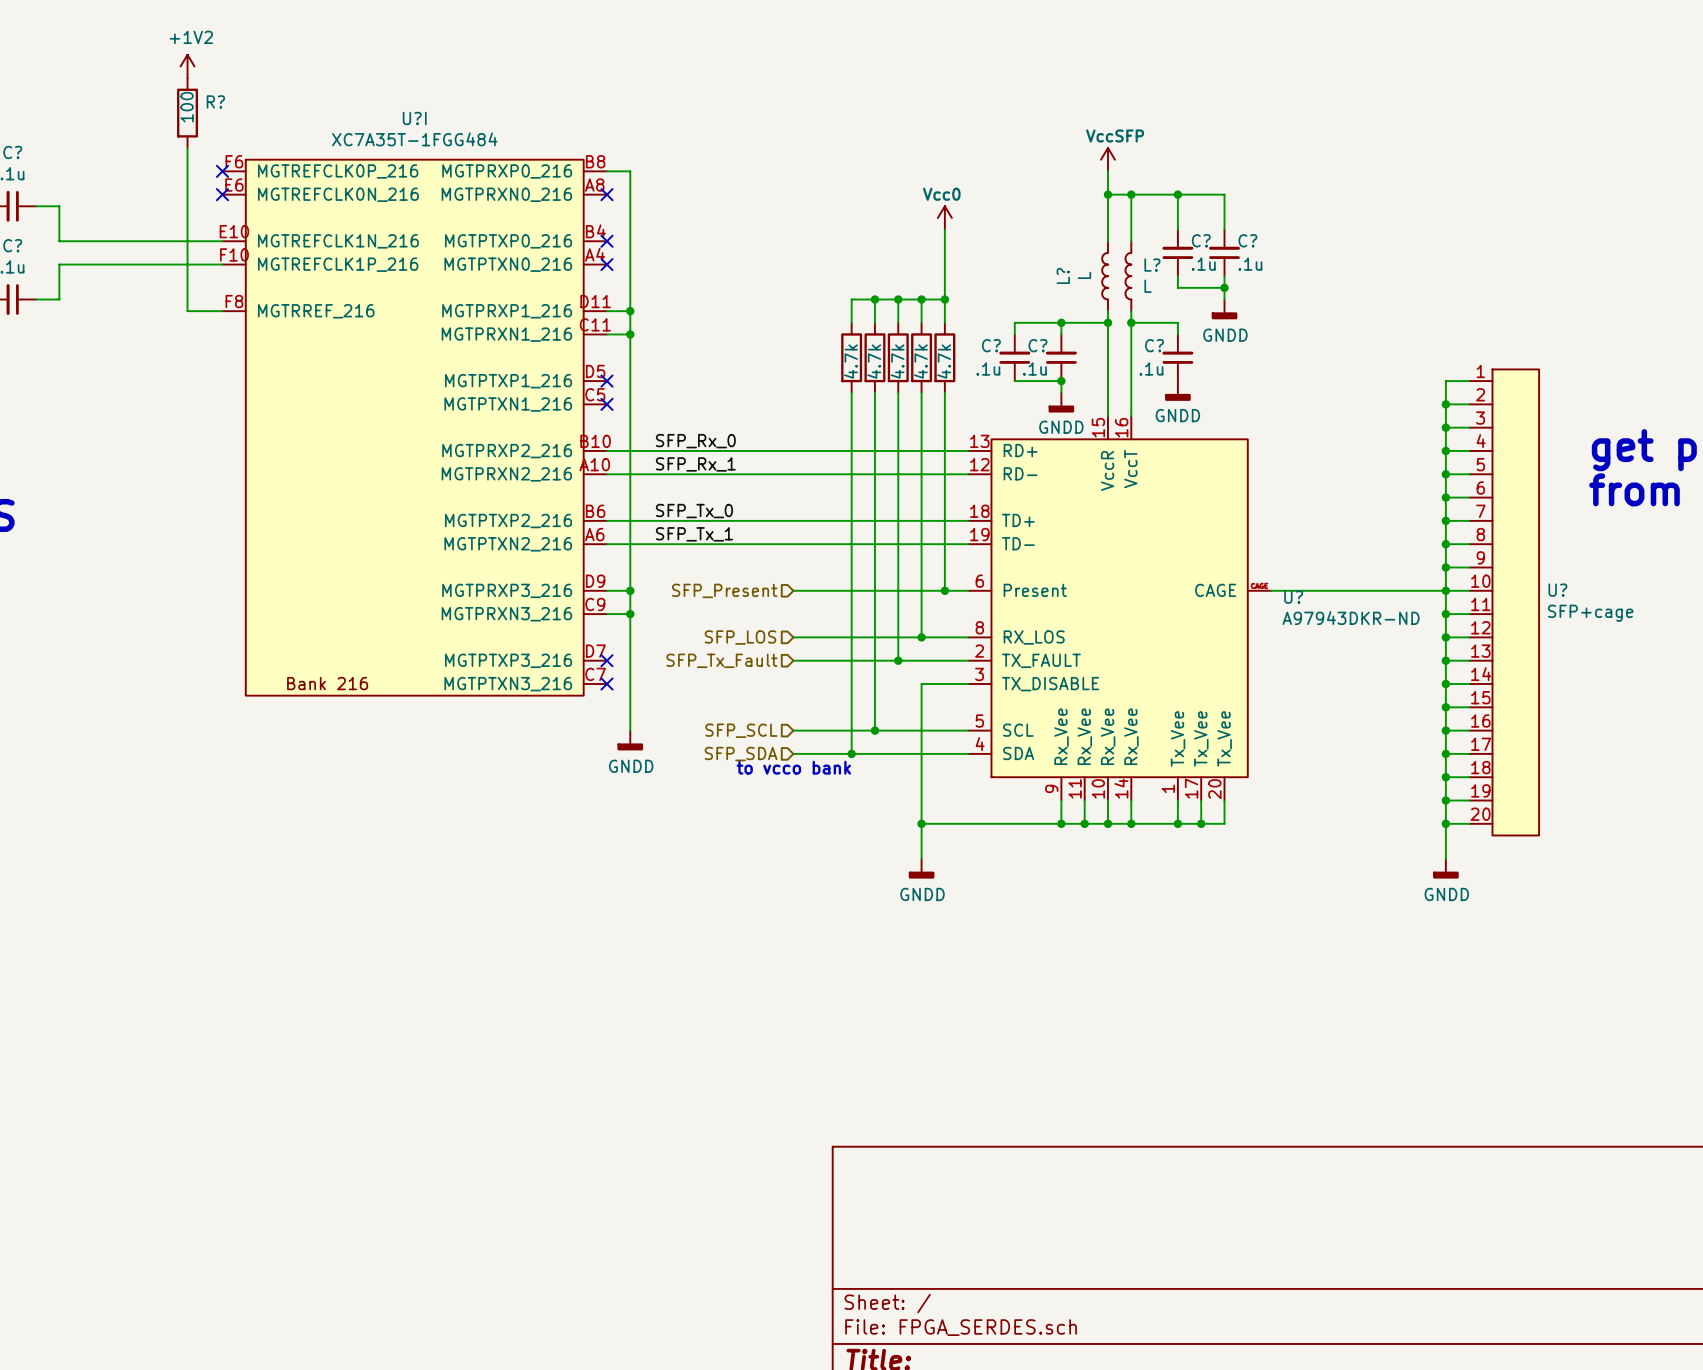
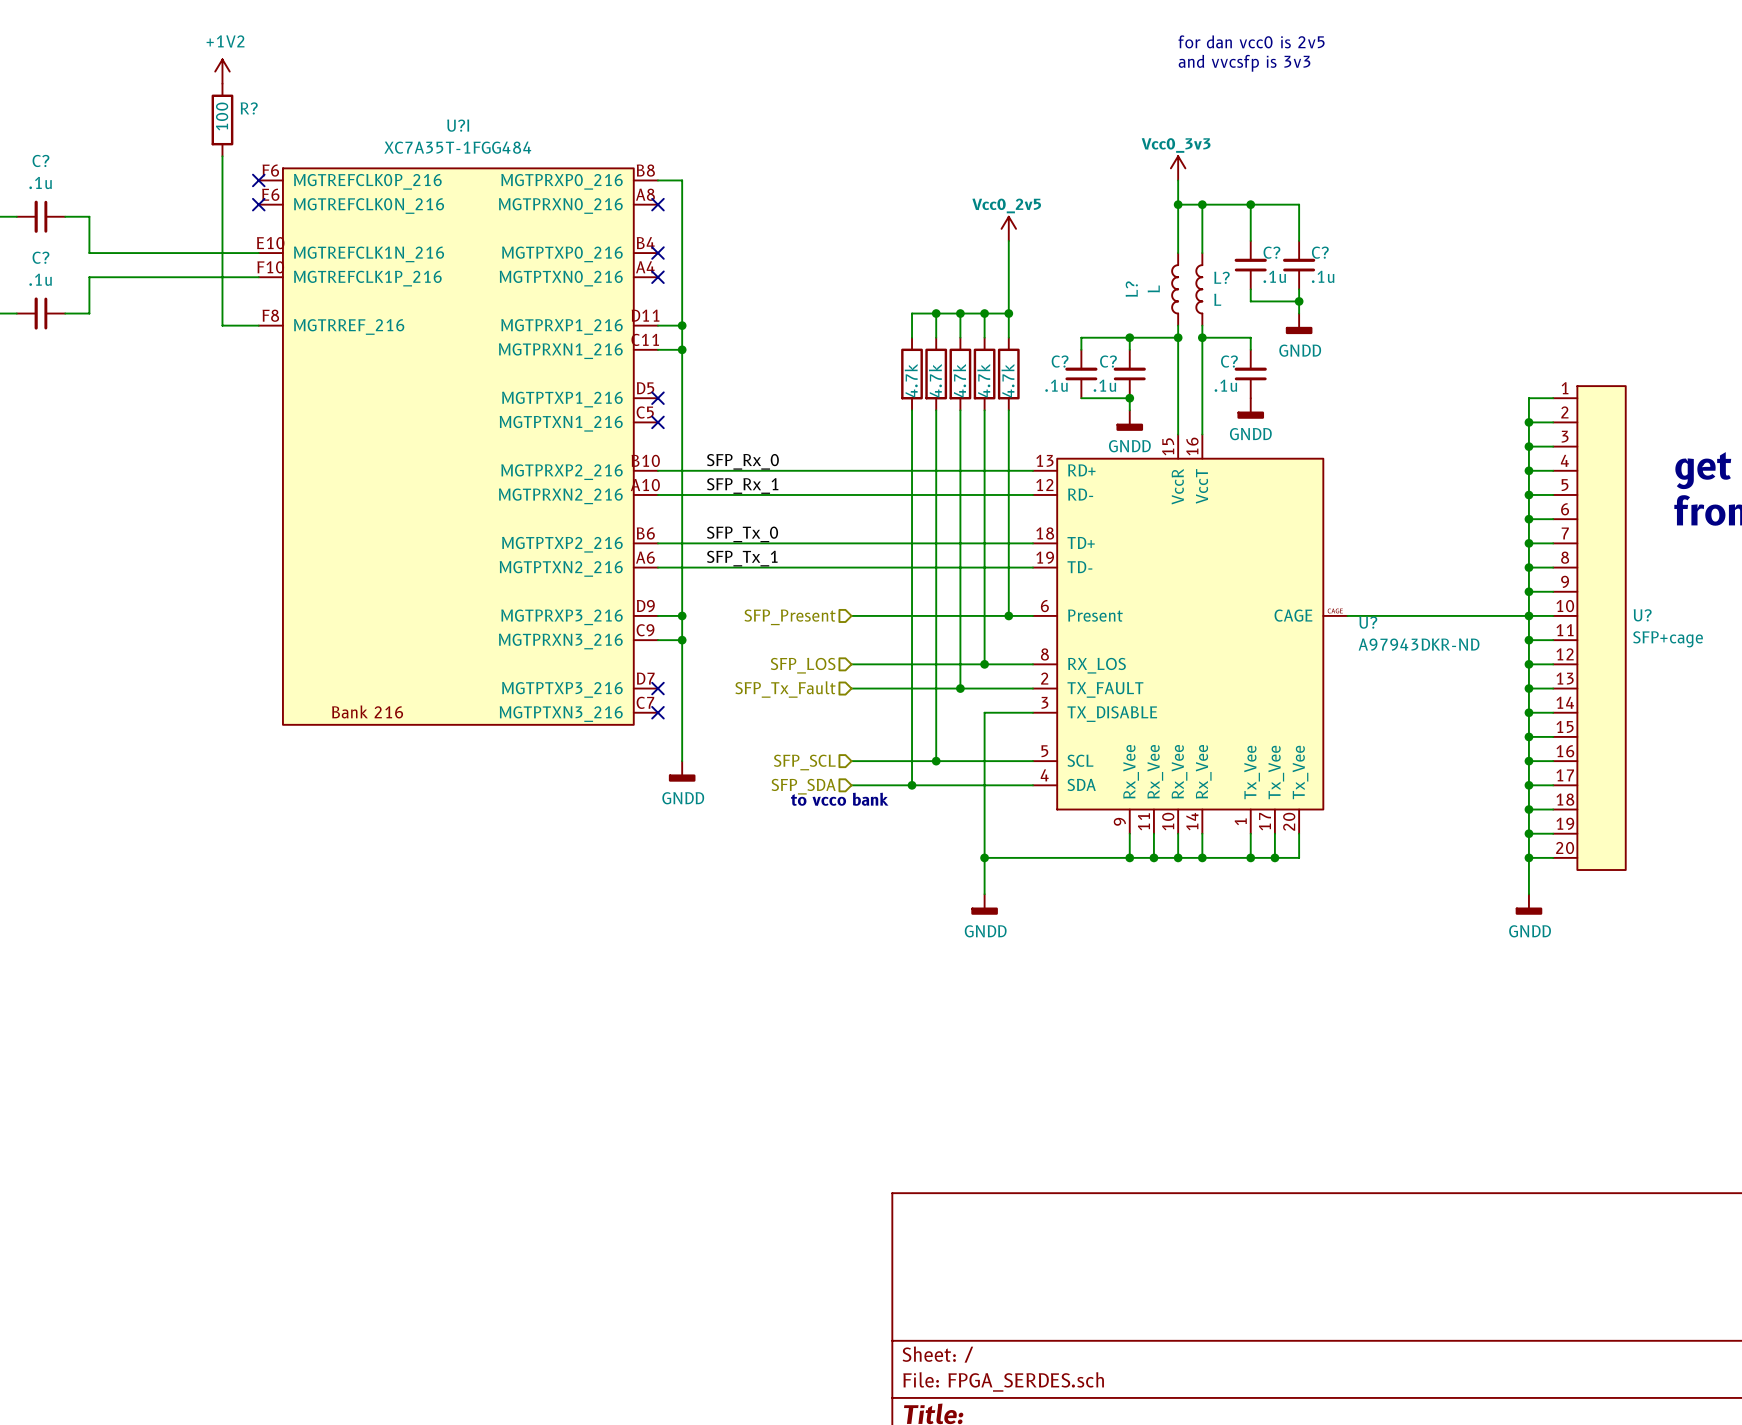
text: none -> for dan vcc0 is 2v5 (1251, 41)
text: none -> and vvcsfp is 3v3 (1244, 63)
part value: VccSFP (1115, 135) -> Vcc0_3v3 (1176, 145)
part value: Vcc0 (941, 194) -> Vcc0_2v5 (1006, 205)

